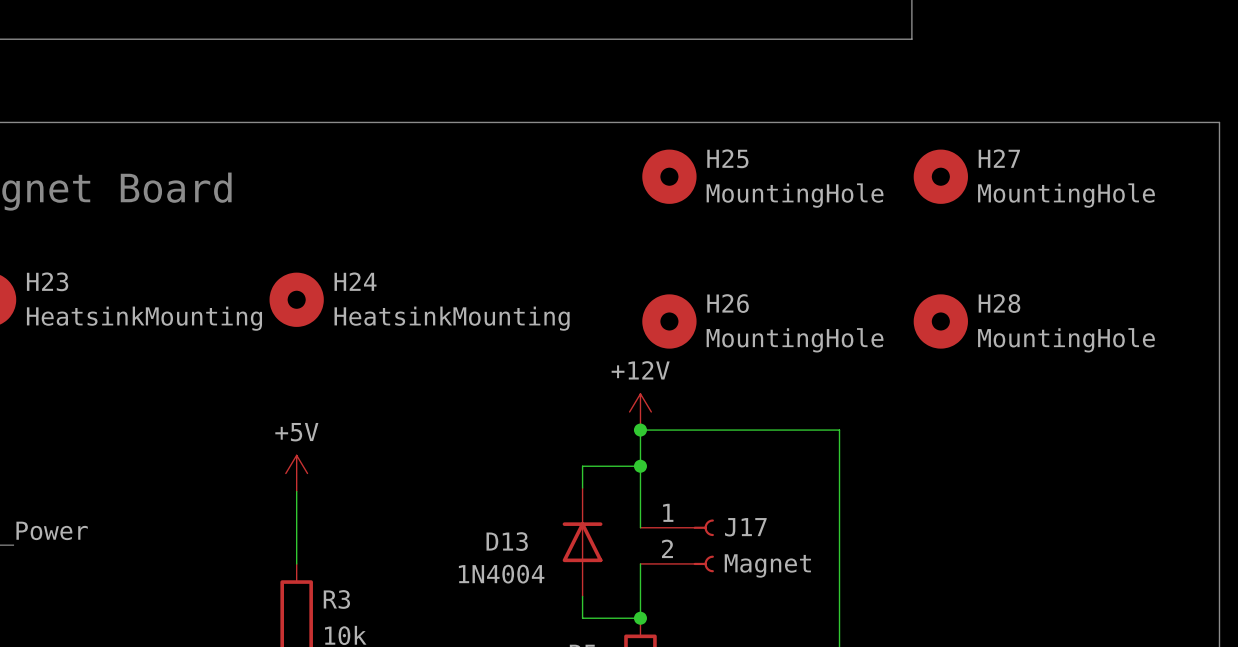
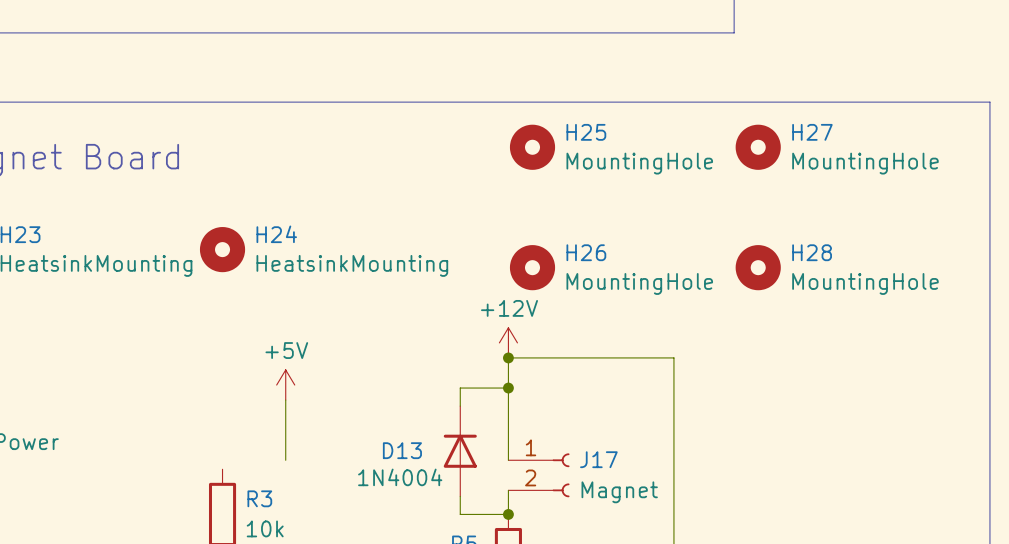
power symbol position: +5V (296, 473) -> +5V (285, 385)
wire: (296, 491) (296, 563) -> (285, 400) (285, 460)
J17 position: (677, 545) -> (538, 475)
wire: (640, 563) (640, 589) -> (508, 439) (508, 460)

